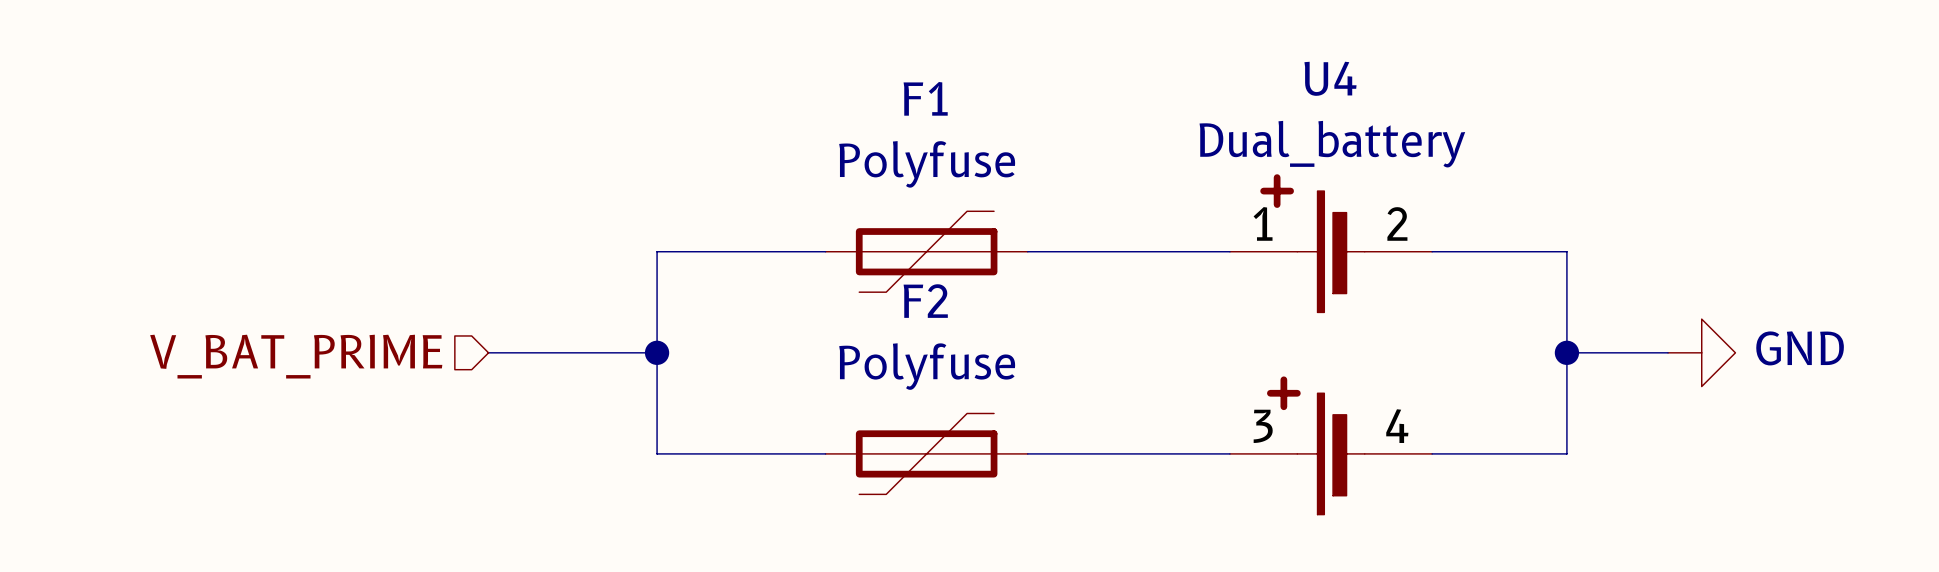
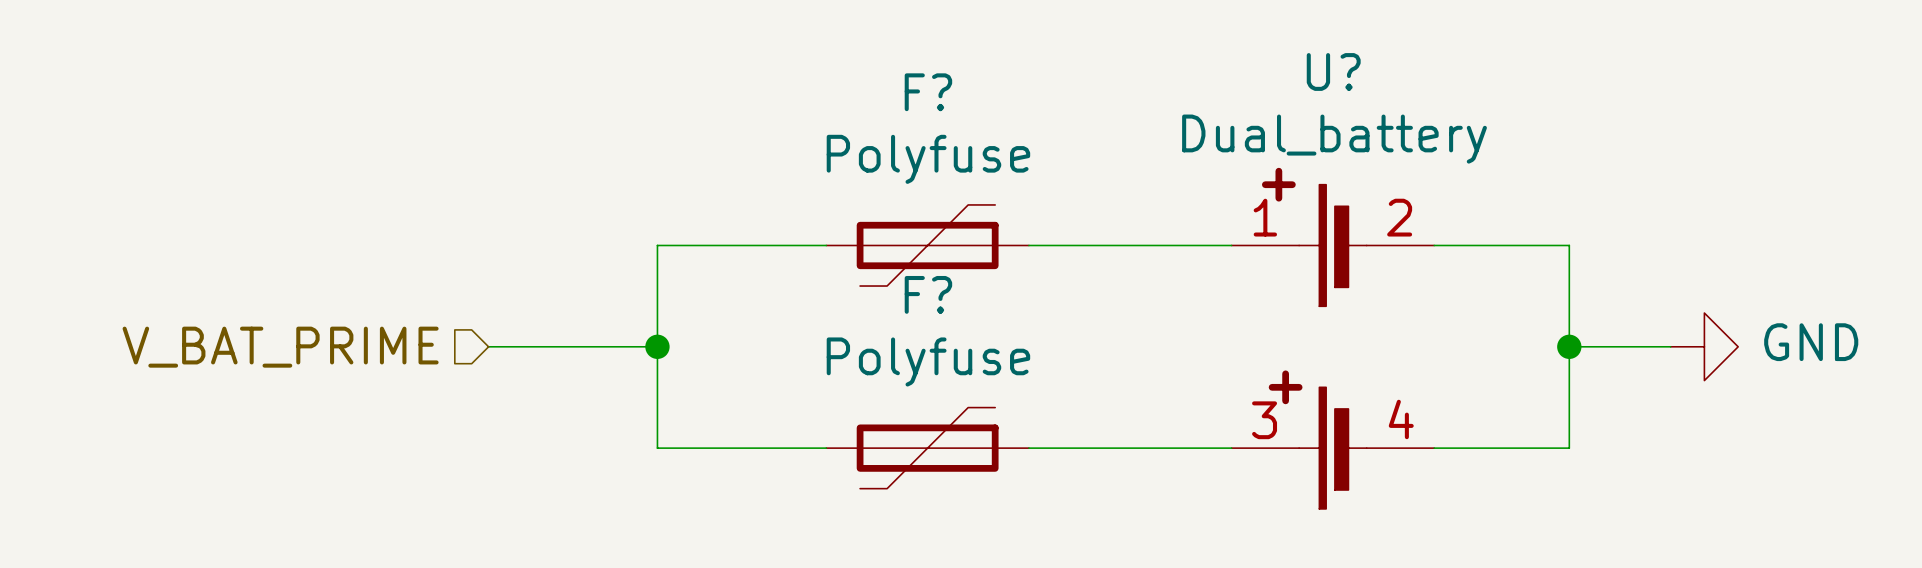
U4 name: U4 (1330, 78) -> U? (1333, 71)
F1 name: F1 (925, 98) -> F? (928, 92)
F2 name: F2 (925, 301) -> F? (928, 294)

